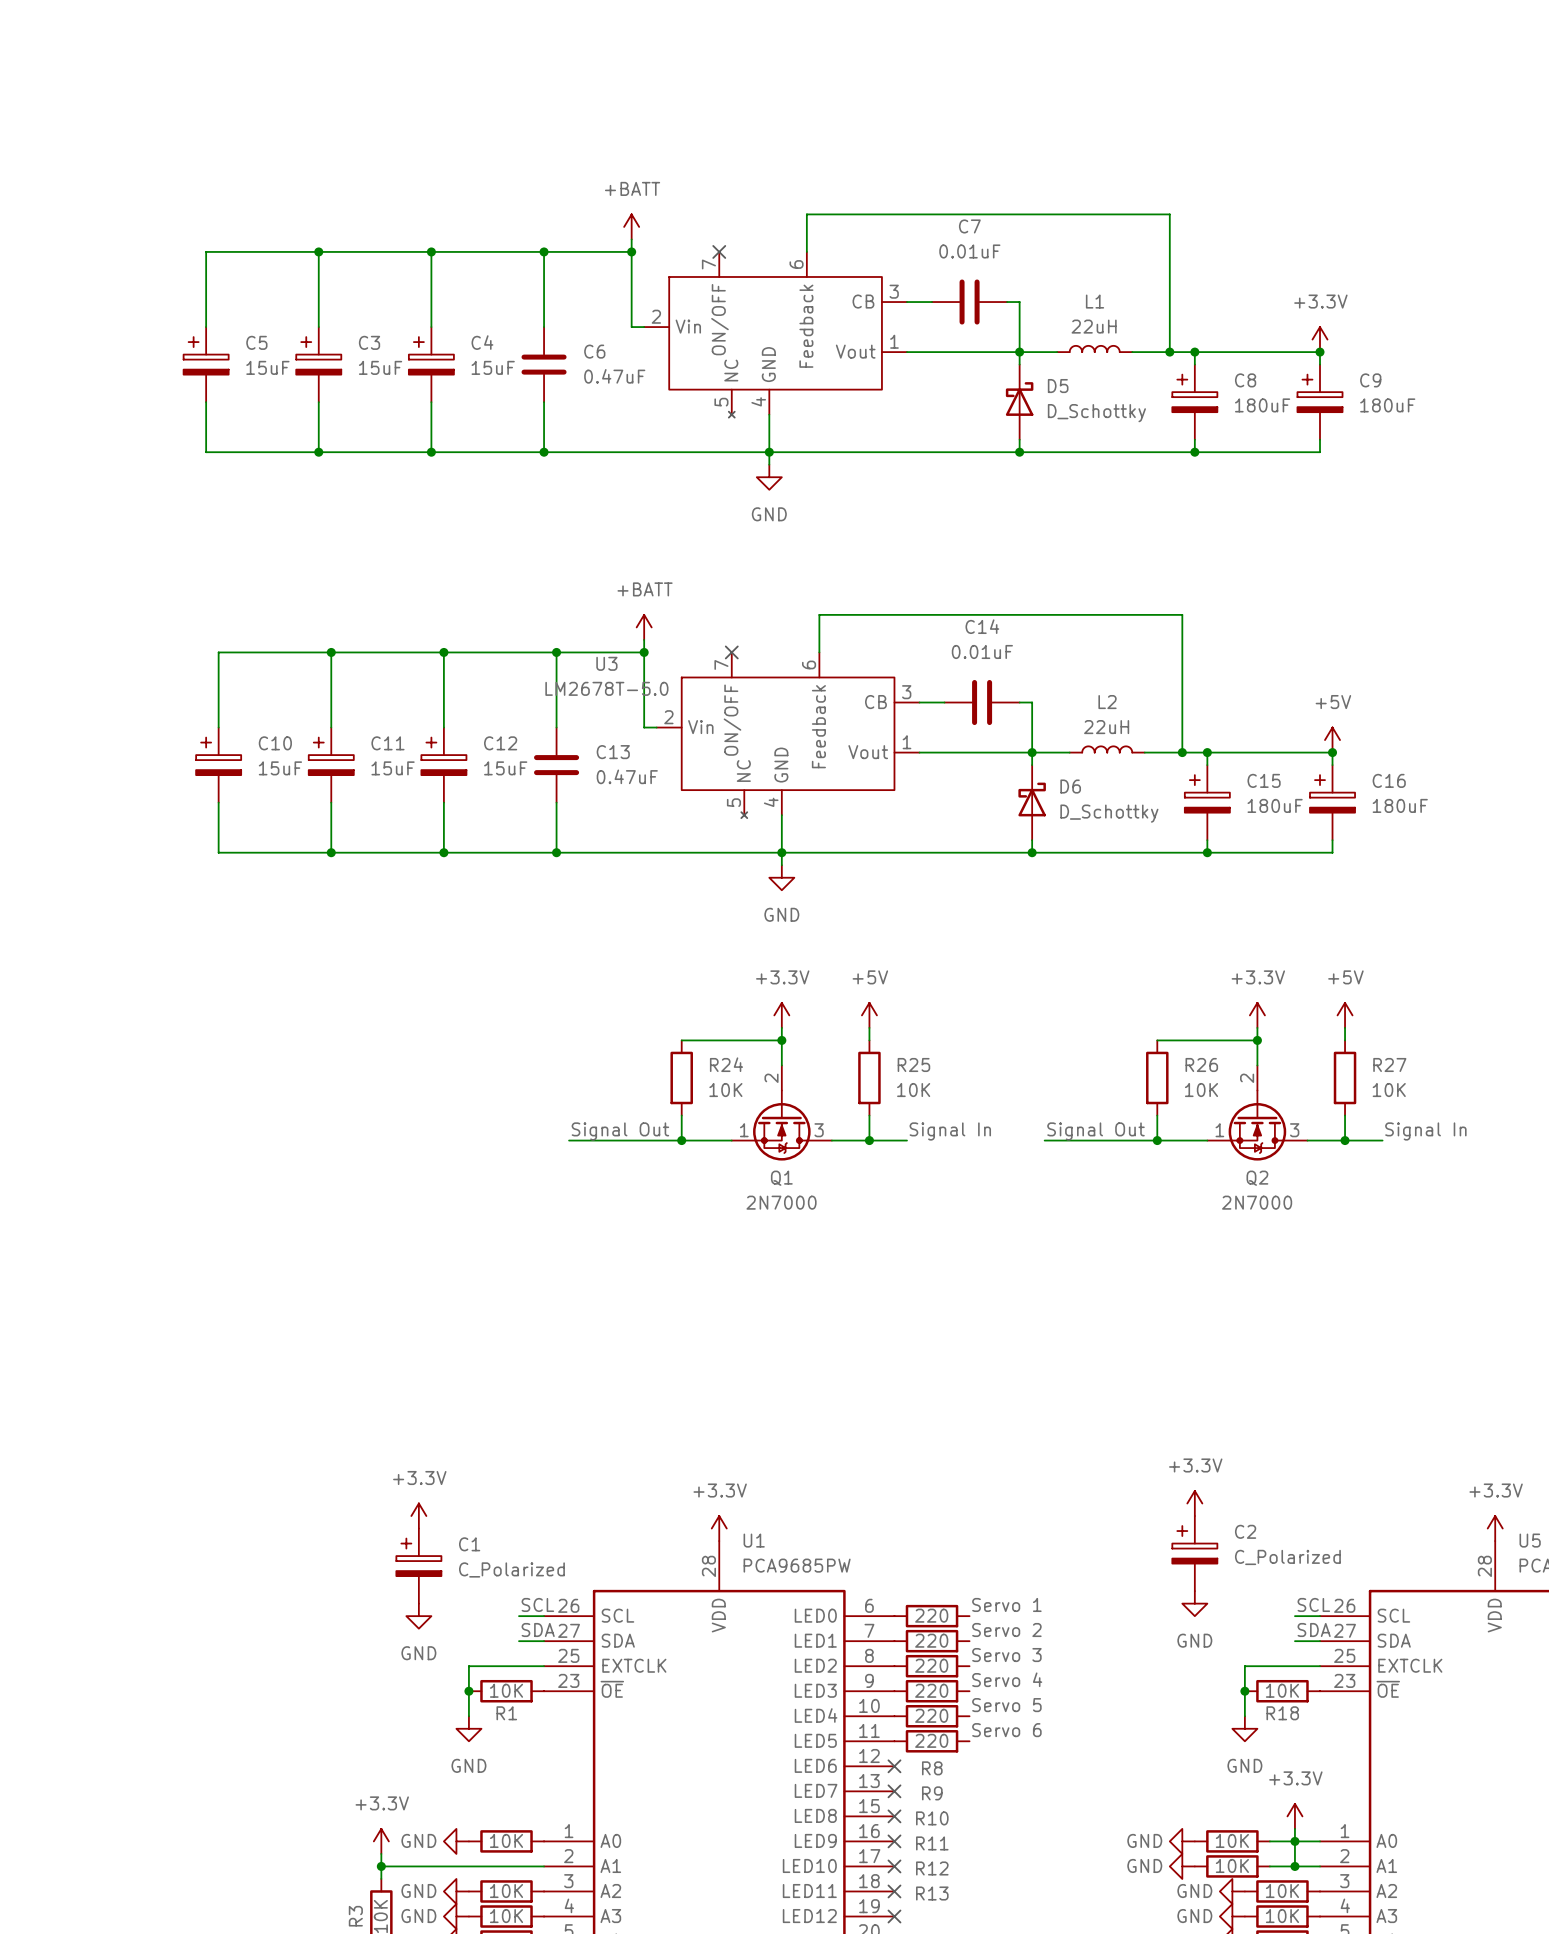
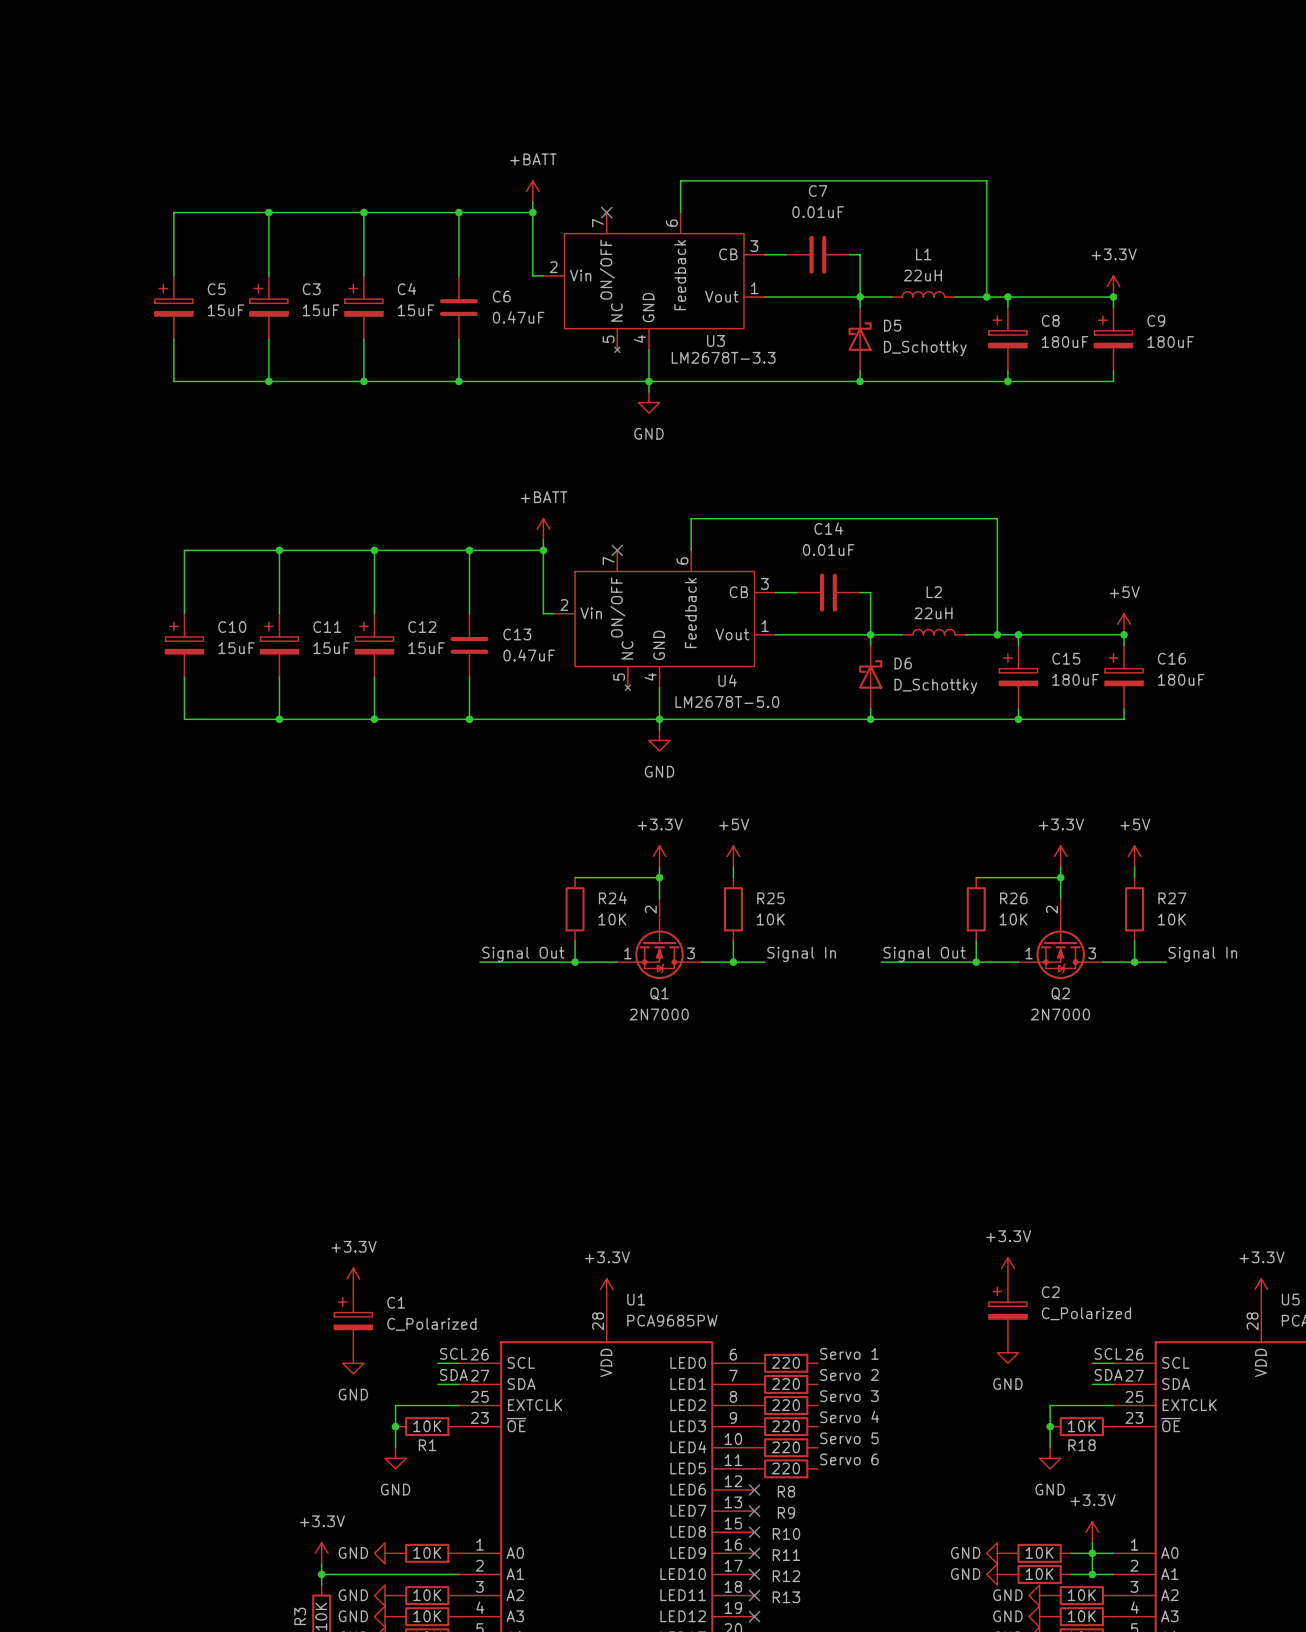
U3 name: none -> U3 (715, 340)
U3 value: none -> LM2678T-3.3 (723, 357)
U3 name: U3 (606, 663) -> U4 (727, 680)
U3 value position: LM2678T-5.0 (606, 688) -> LM2678T-5.0 (727, 702)

